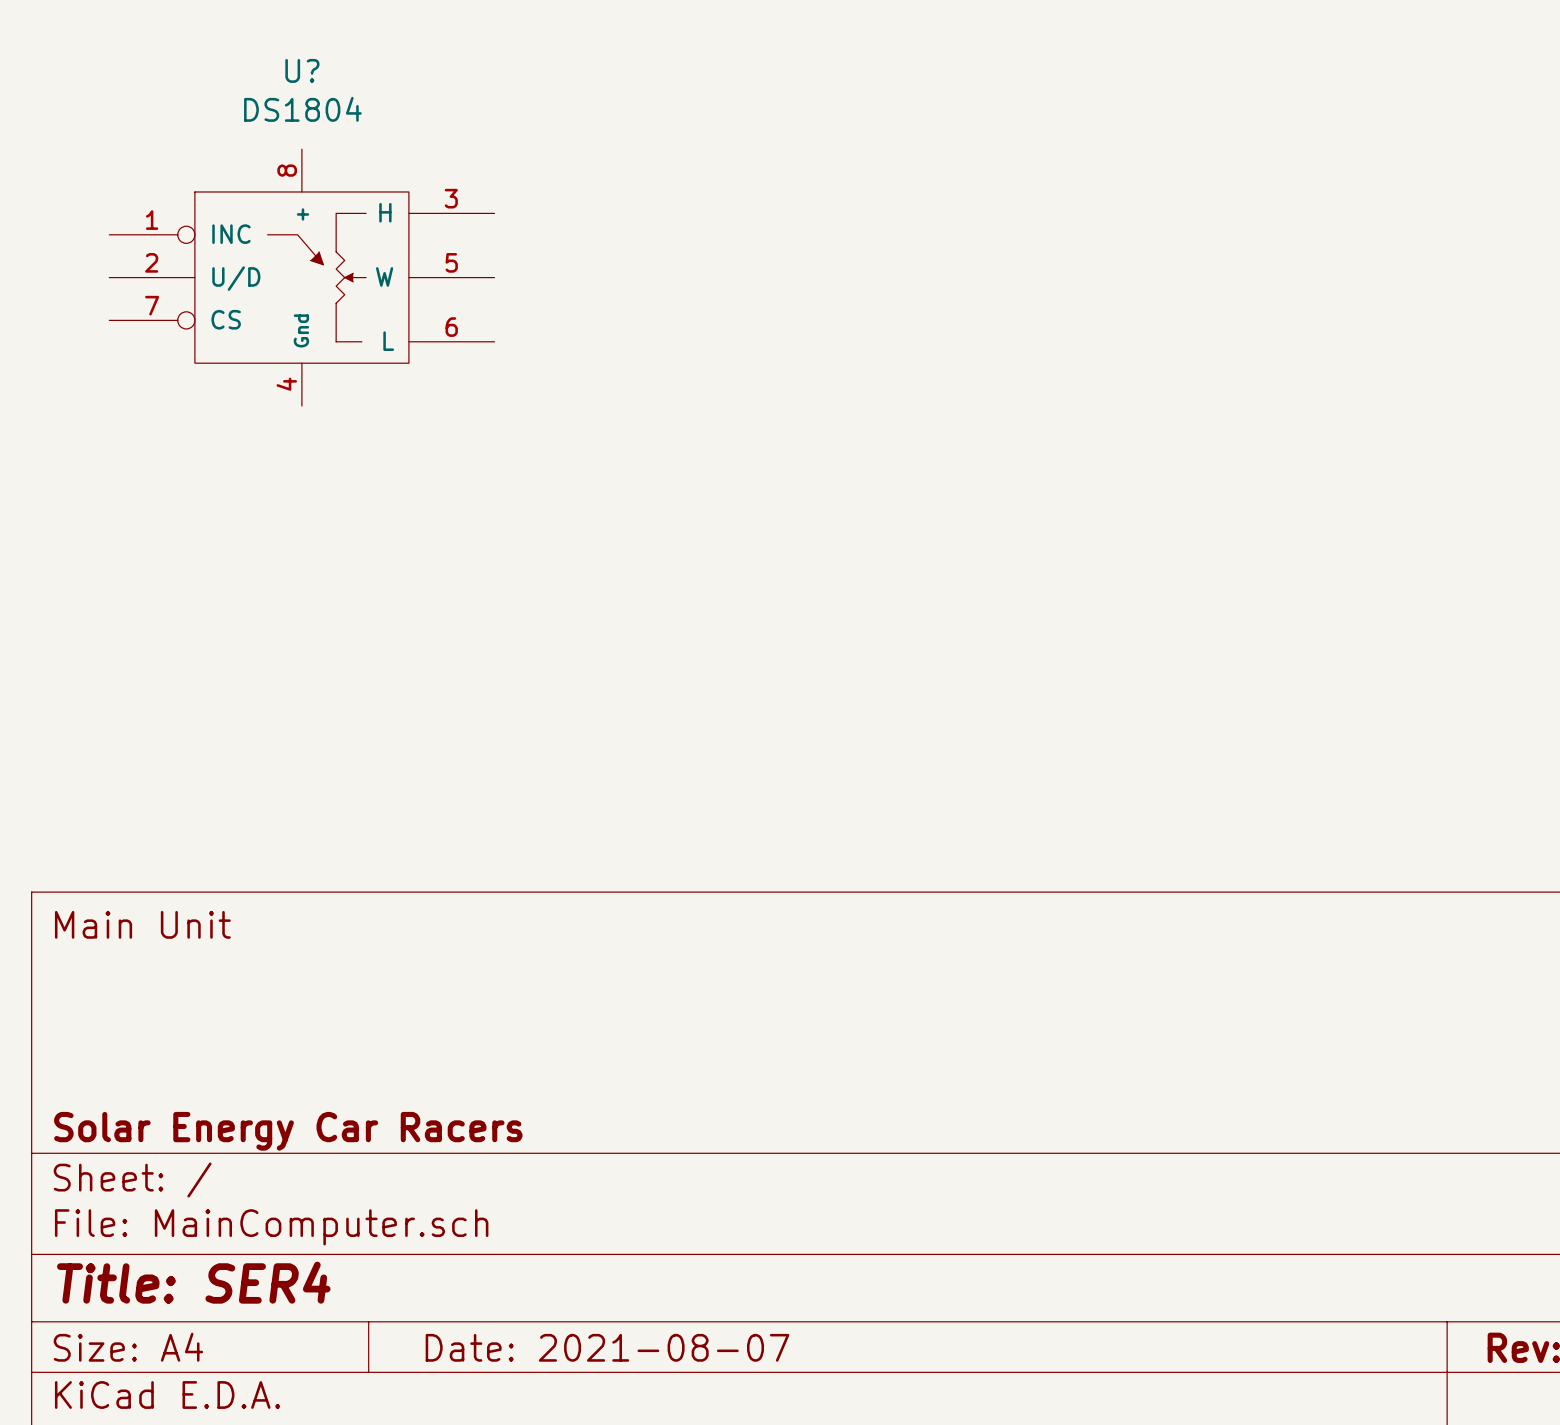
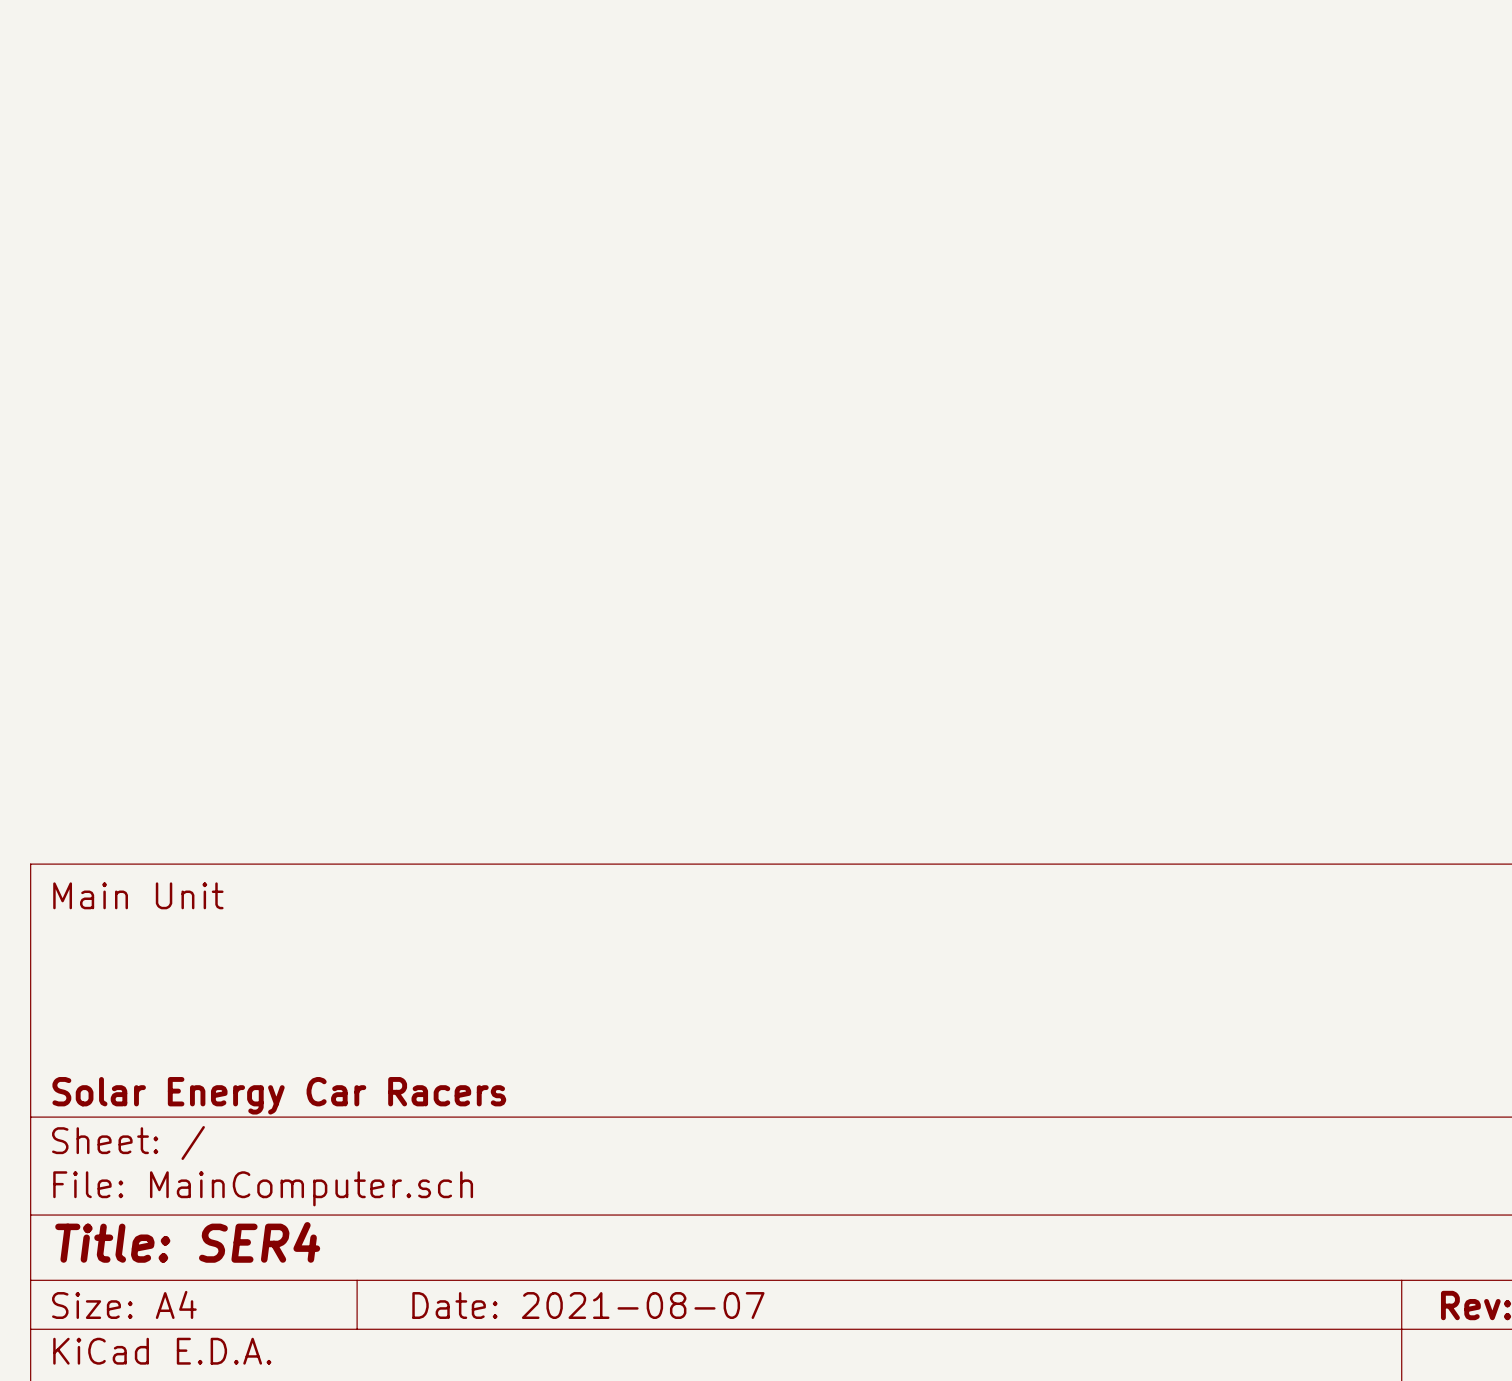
U?: DS1804 (301, 277) -> none

